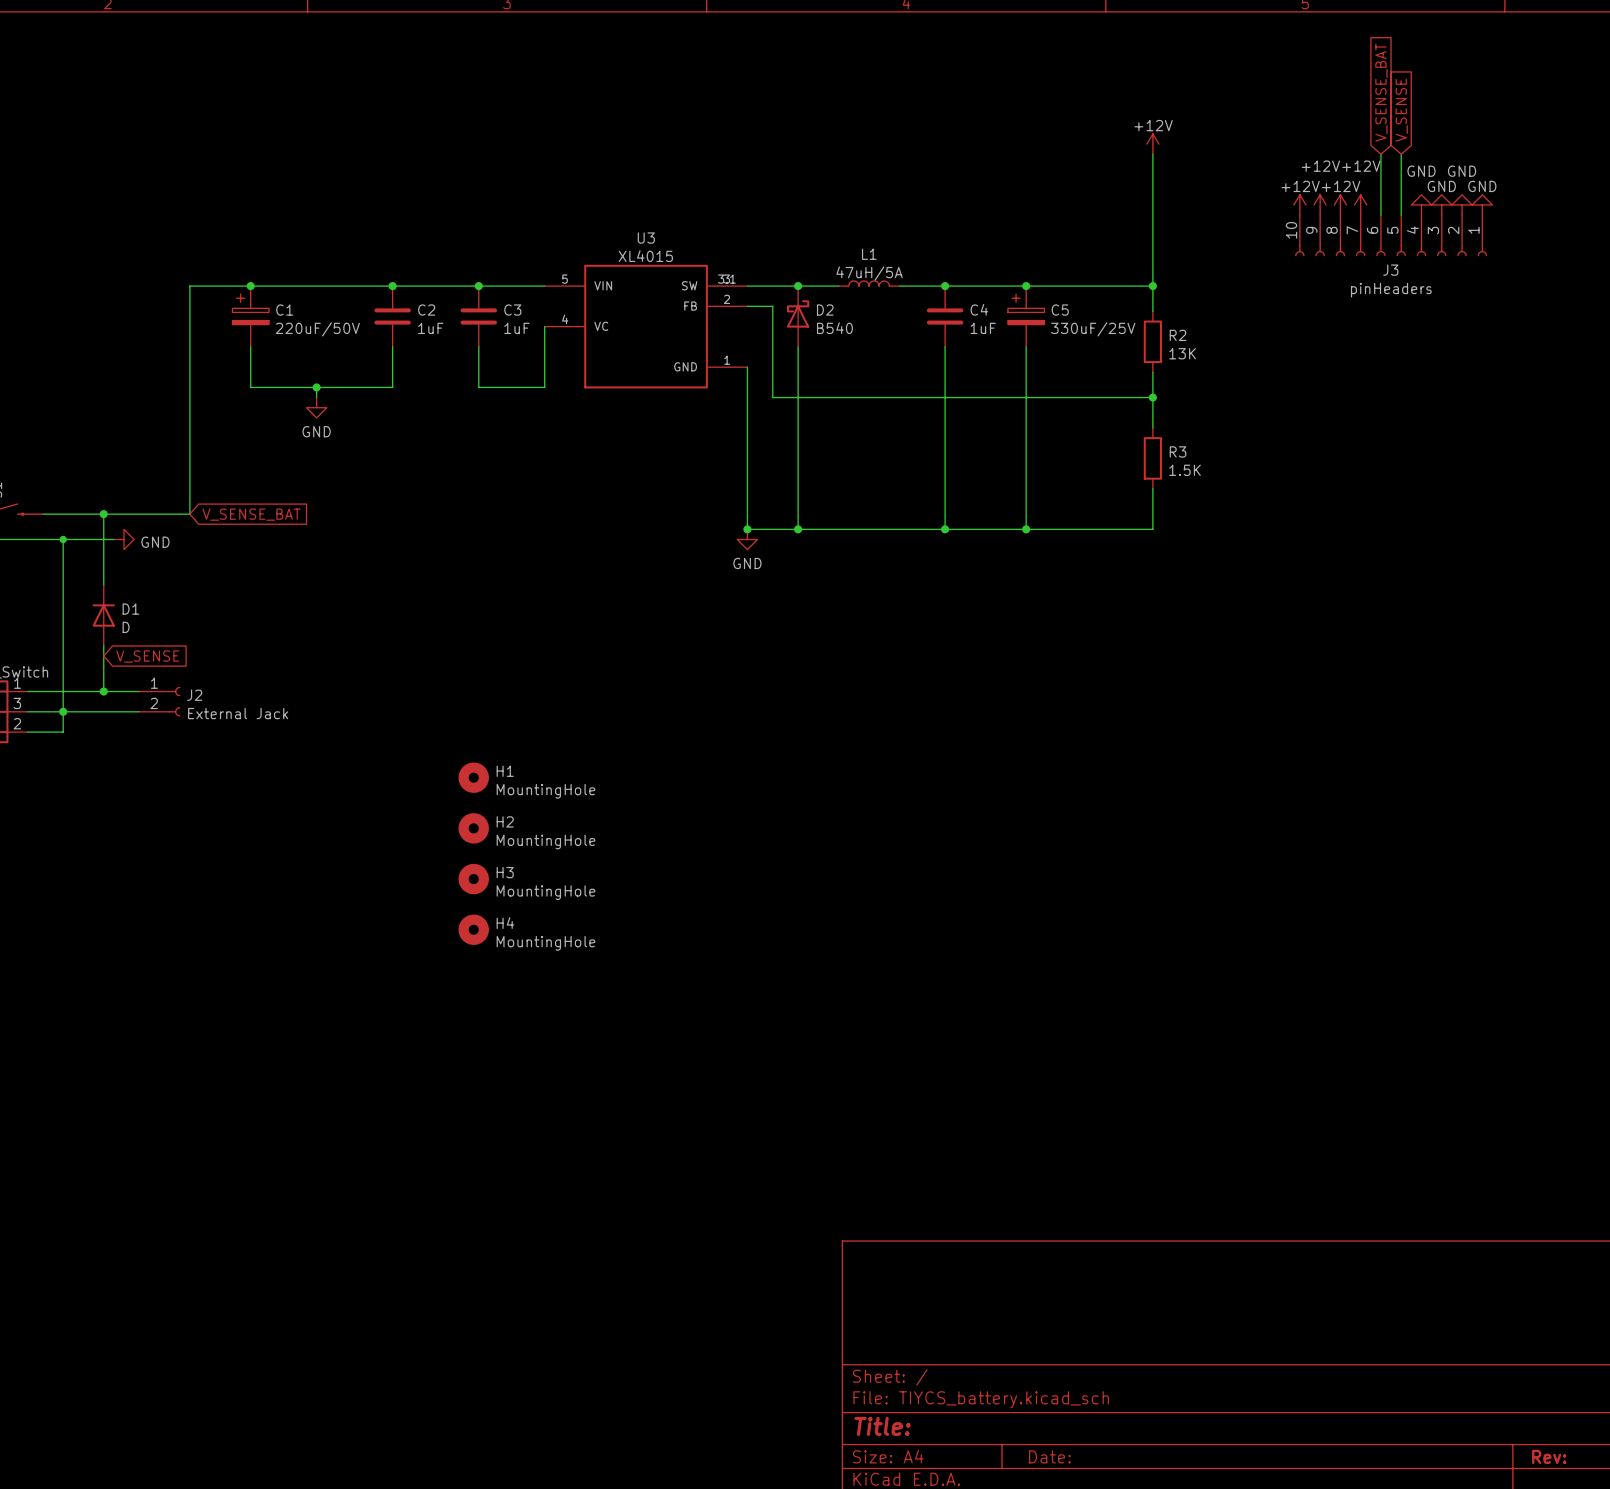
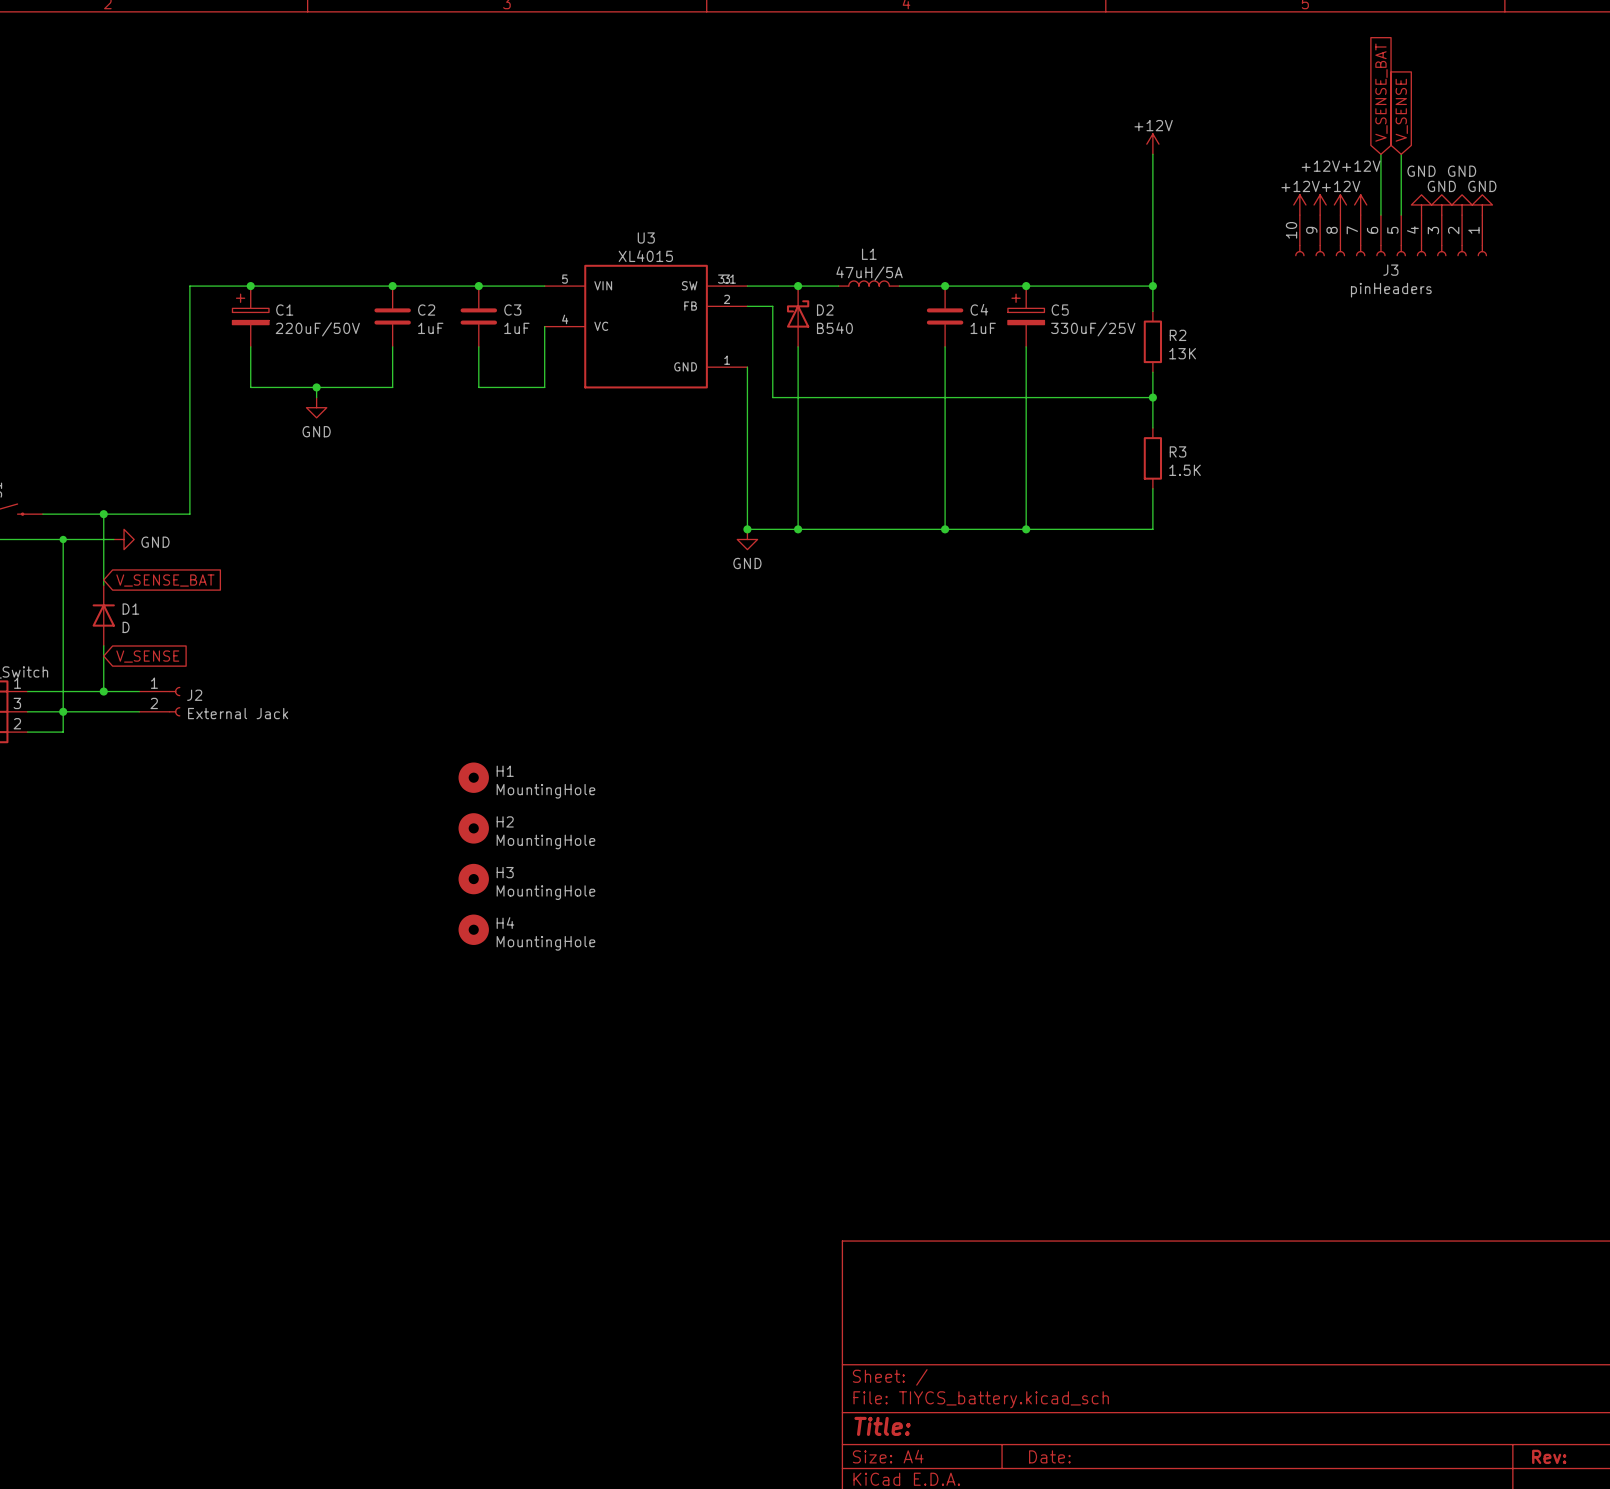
global label position: V_SENSE_BAT (251, 514) -> V_SENSE_BAT (165, 580)

